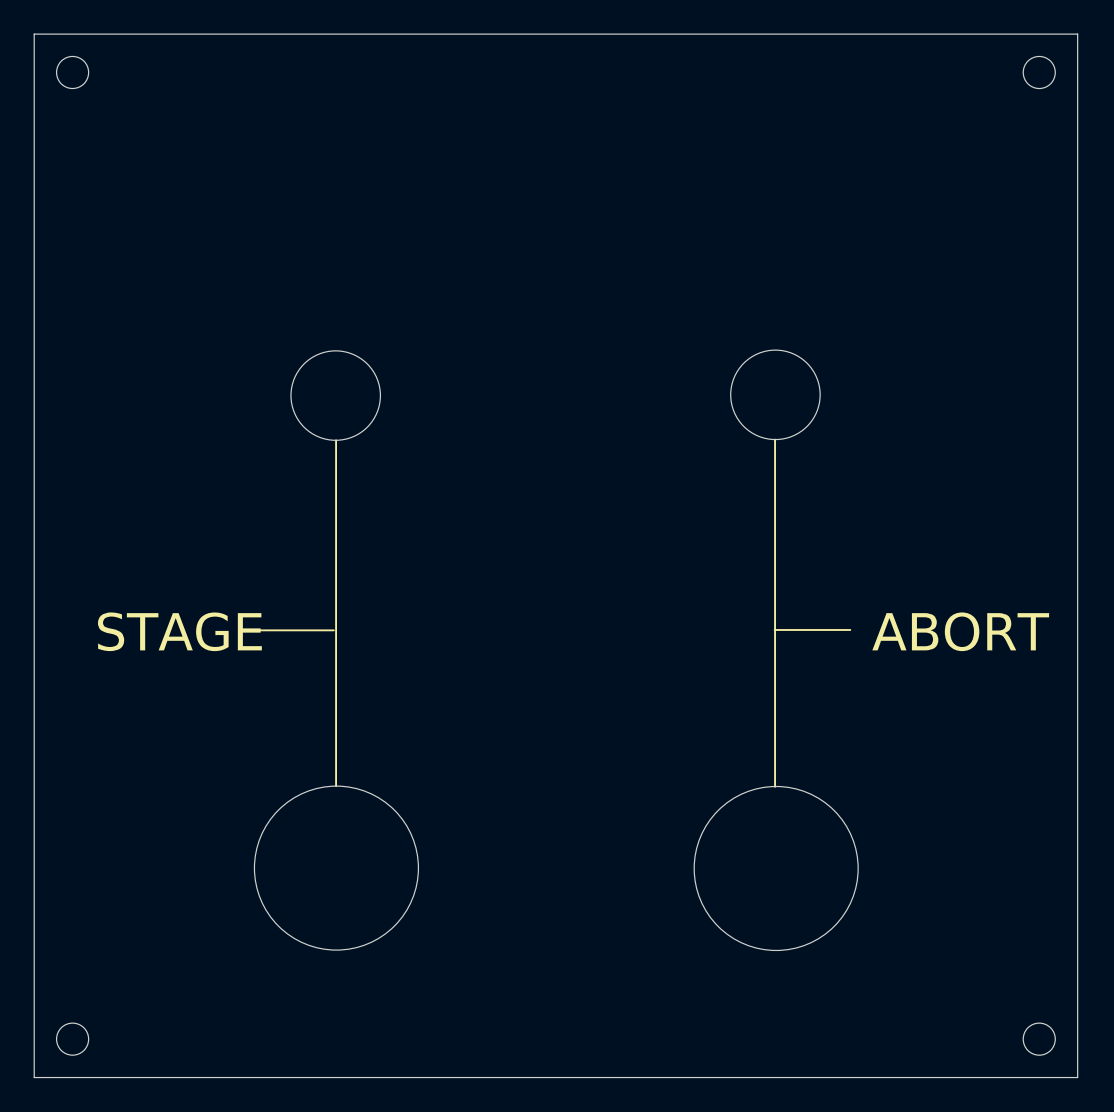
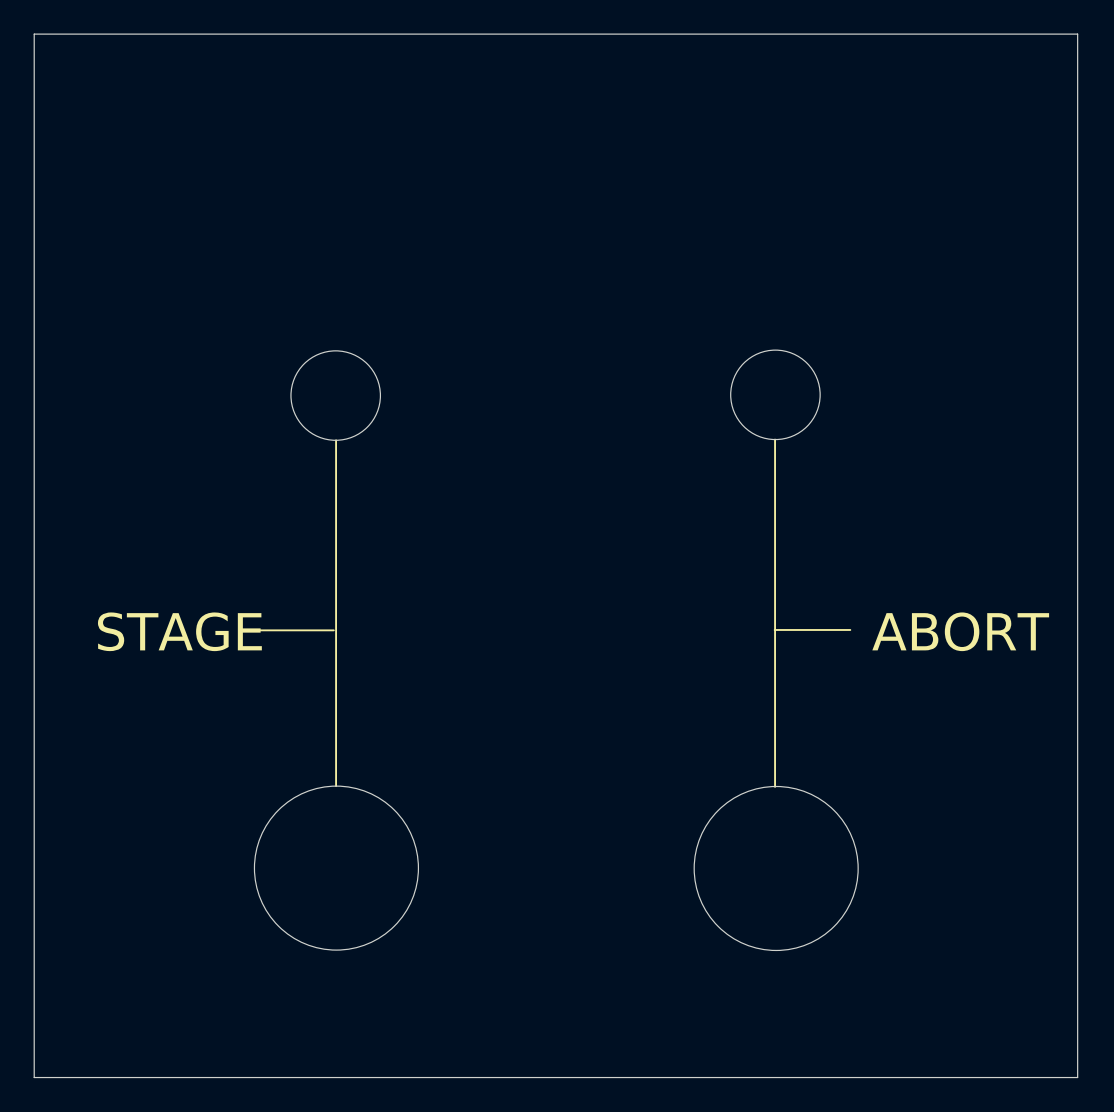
round board edge: [56, 56, 89, 89] -> none
round board edge: [1022, 56, 1056, 89] -> none
round board edge: [56, 1022, 89, 1056] -> none
round board edge: [1022, 1022, 1056, 1056] -> none

